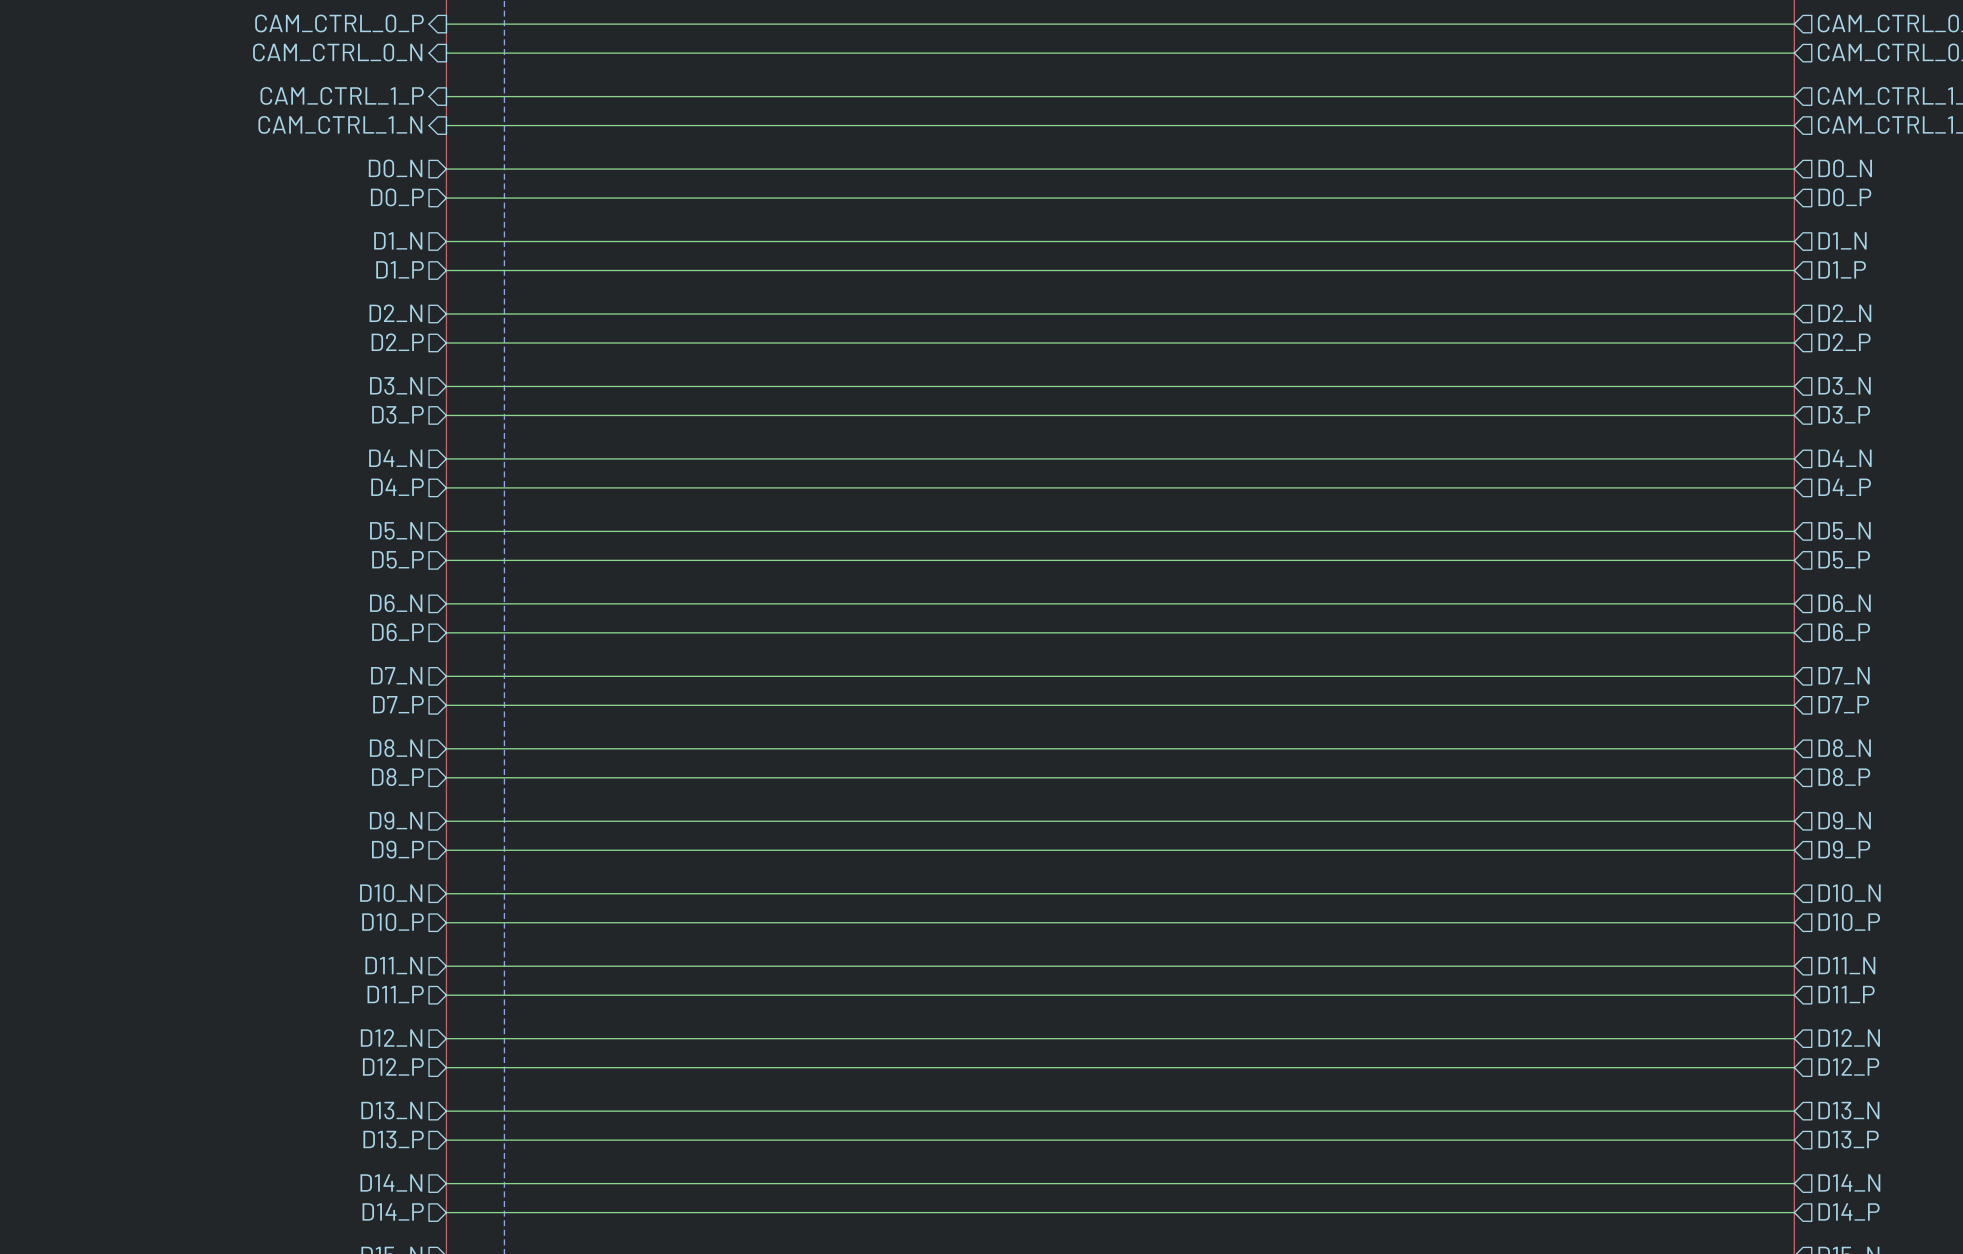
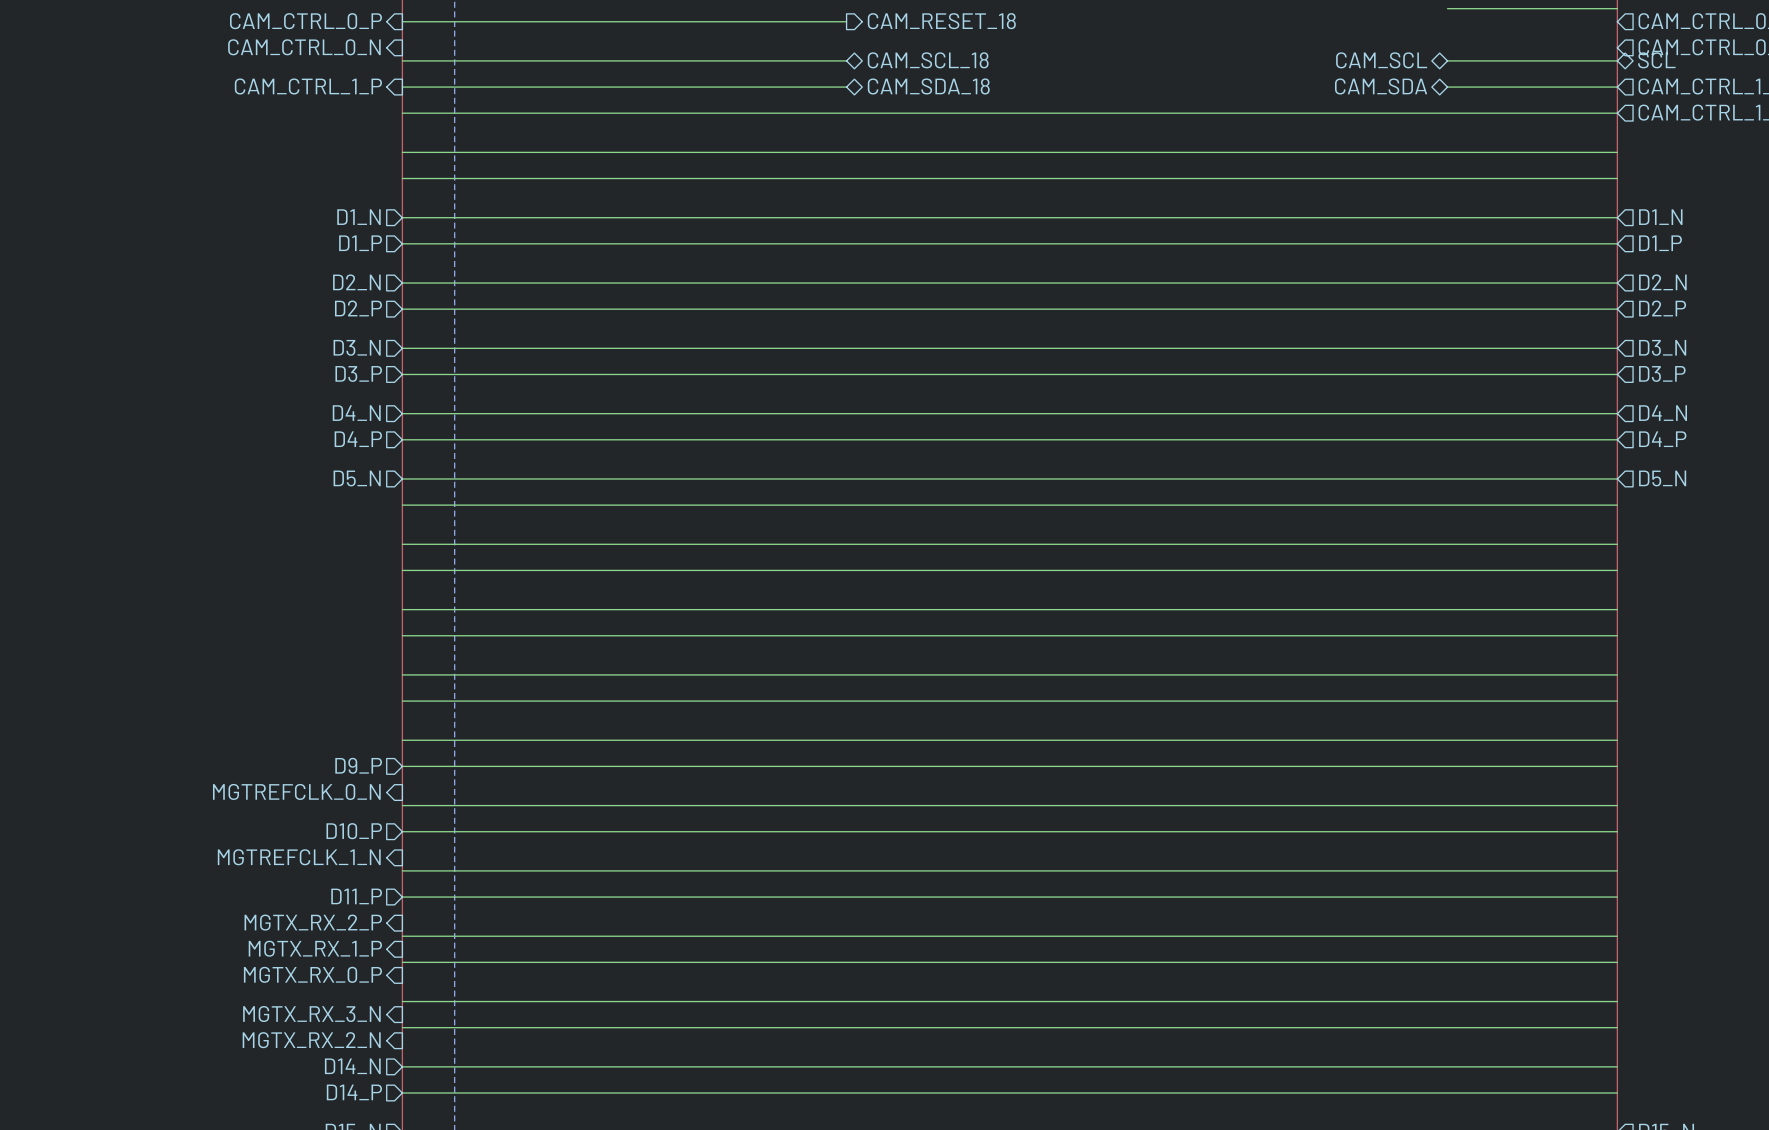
wire: none -> (1447, 8) (1617, 8)
sheet pin: none -> CAM_RESET_18 (941, 21)
wire: (939, 24) (1794, 24) -> none
wire: (446, 53) (1794, 53) -> none
sheet pin: none -> CAM_SCL_18 (928, 60)
sheet pin: none -> CAM_SCL (1381, 60)
sheet pin: none -> SCL (1656, 60)
wire: none -> (402, 60) (846, 60)
wire: none -> (1447, 60) (1617, 60)
sheet pin: none -> CAM_SDA_18 (928, 86)
sheet pin: none -> CAM_SDA (1381, 86)
wire: (939, 96) (1605, 96) -> none
sheet pin: CAM_CTRL_1_N (340, 124) -> none
sheet pin: D0_N (395, 168) -> none
sheet pin: D0_N (1845, 168) -> none
sheet pin: D0_P (397, 197) -> none
sheet pin: D0_P (1844, 197) -> none
sheet pin: D5_P (397, 559) -> none
sheet pin: D5_P (1844, 559) -> none
sheet pin: D6_N (396, 603) -> none
sheet pin: D6_N (1844, 603) -> none
sheet pin: D6_P (397, 632) -> none
sheet pin: D6_P (1844, 632) -> none
sheet pin: D7_N (396, 675) -> none
sheet pin: D7_N (1844, 675) -> none
sheet pin: D7_P (398, 704) -> none
sheet pin: D7_P (1843, 704) -> none
sheet pin: D8_N (396, 748) -> none
sheet pin: D8_N (1844, 748) -> none
sheet pin: D8_P (397, 777) -> none
sheet pin: D8_P (1844, 777) -> none
sheet pin: D9_N (396, 820) -> none
sheet pin: D9_N (1844, 820) -> none
sheet pin: D9_P (1844, 849) -> none
sheet pin: none -> MGTREFCLK_0_N (296, 791)
sheet pin: D10_N (391, 893) -> none
sheet pin: D10_N (1849, 893) -> none
sheet pin: D10_P (1849, 922) -> none
sheet pin: none -> MGTREFCLK_1_N (299, 857)
sheet pin: D11_N (393, 965) -> none
sheet pin: D11_N (1846, 965) -> none
sheet pin: D11_P (1846, 994) -> none
sheet pin: none -> MGTX_RX_2_P (313, 922)
sheet pin: D12_N (391, 1037) -> none
sheet pin: D12_N (1849, 1037) -> none
sheet pin: none -> MGTX_RX_1_P (315, 948)
sheet pin: D12_P (393, 1066) -> none
sheet pin: D12_P (1848, 1066) -> none
sheet pin: none -> MGTX_RX_0_P (312, 974)
sheet pin: D13_N (391, 1110) -> none
sheet pin: D13_N (1848, 1110) -> none
sheet pin: none -> MGTX_RX_3_N (311, 1014)
sheet pin: D13_P (393, 1139) -> none
sheet pin: D13_P (1848, 1139) -> none
sheet pin: none -> MGTX_RX_2_N (311, 1040)
sheet pin: D14_N (1849, 1182) -> none
sheet pin: D14_P (1849, 1211) -> none

